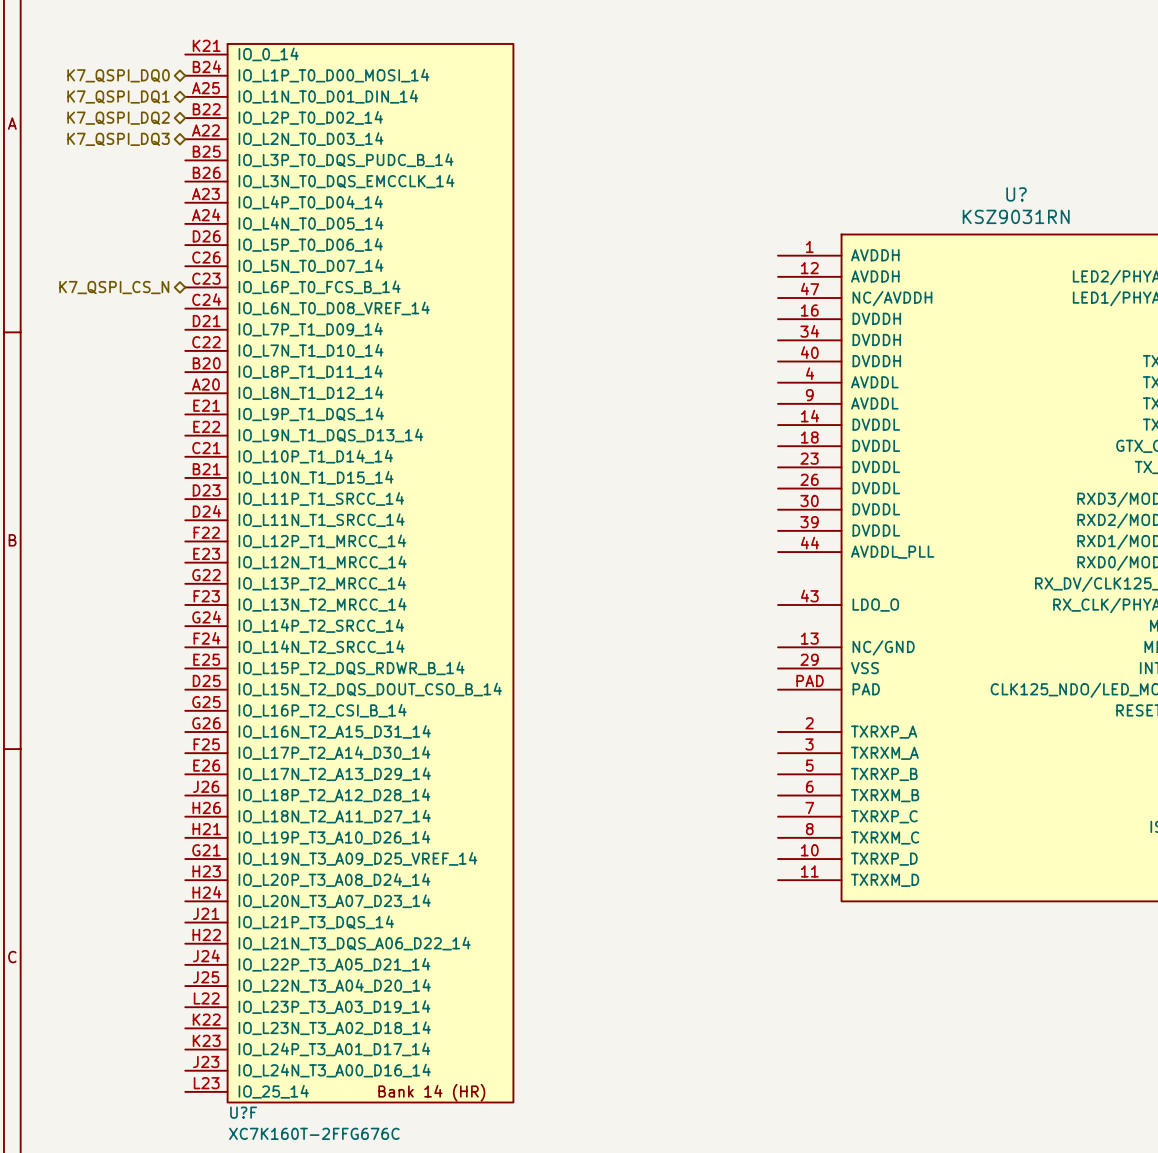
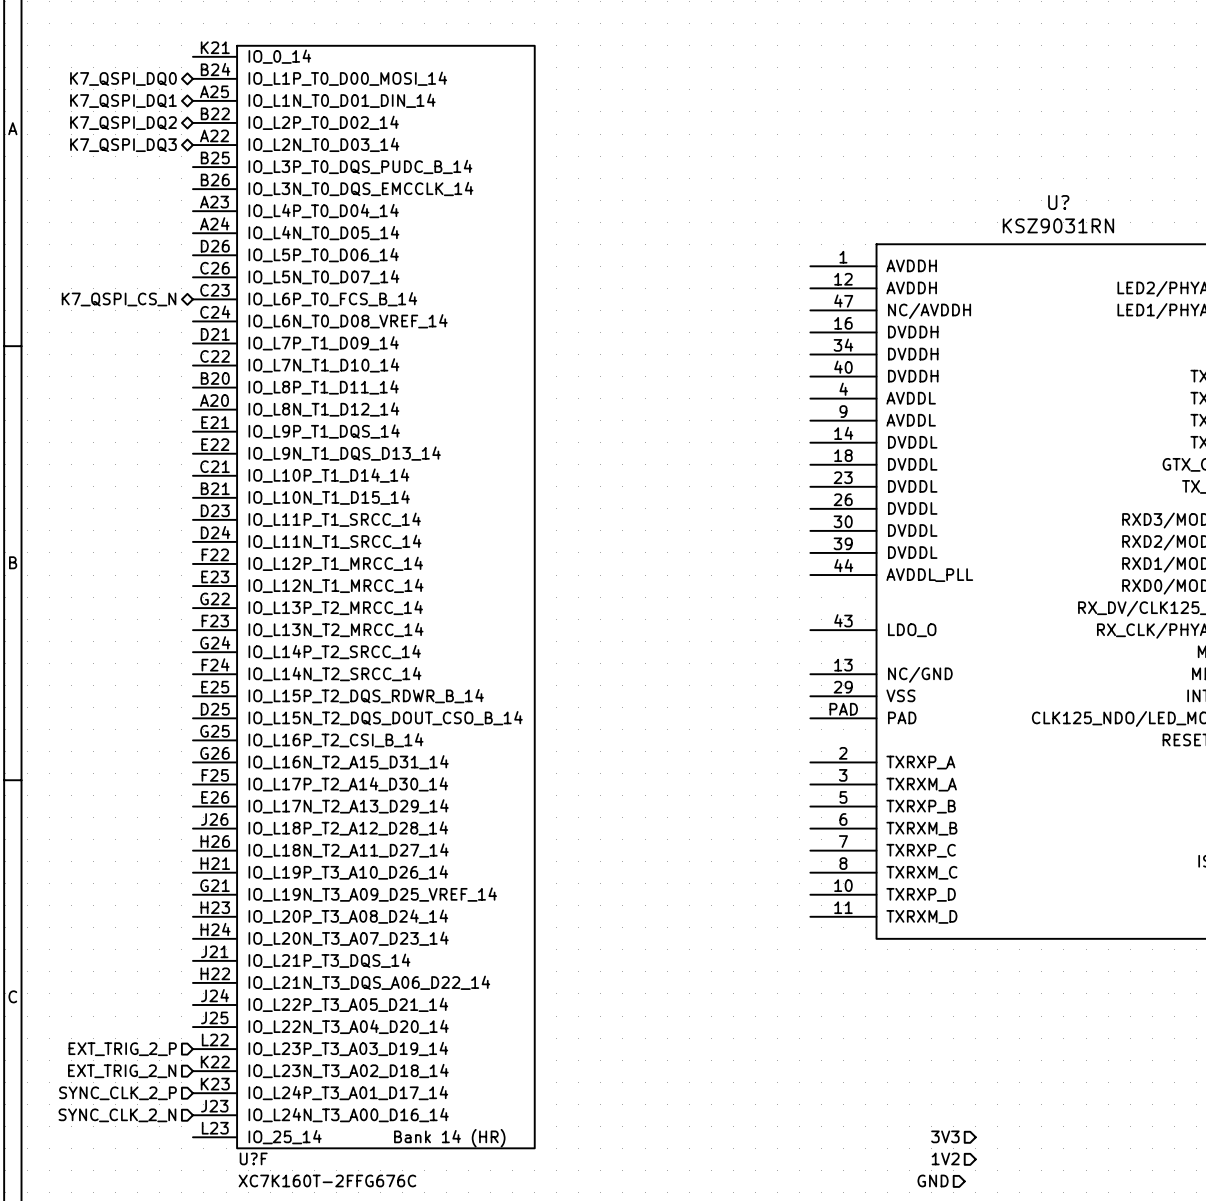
hierarchical label: none -> EXT_TRIG_2_P (122, 1049)
hierarchical label: none -> EXT_TRIG_2_N (122, 1071)
hierarchical label: none -> SYNC_CLK_2_P (117, 1093)
hierarchical label: none -> SYNC_CLK_2_N (117, 1115)
hierarchical label: none -> 3V3 (945, 1136)
hierarchical label: none -> 1V2 (945, 1158)
hierarchical label: none -> GND (933, 1180)

